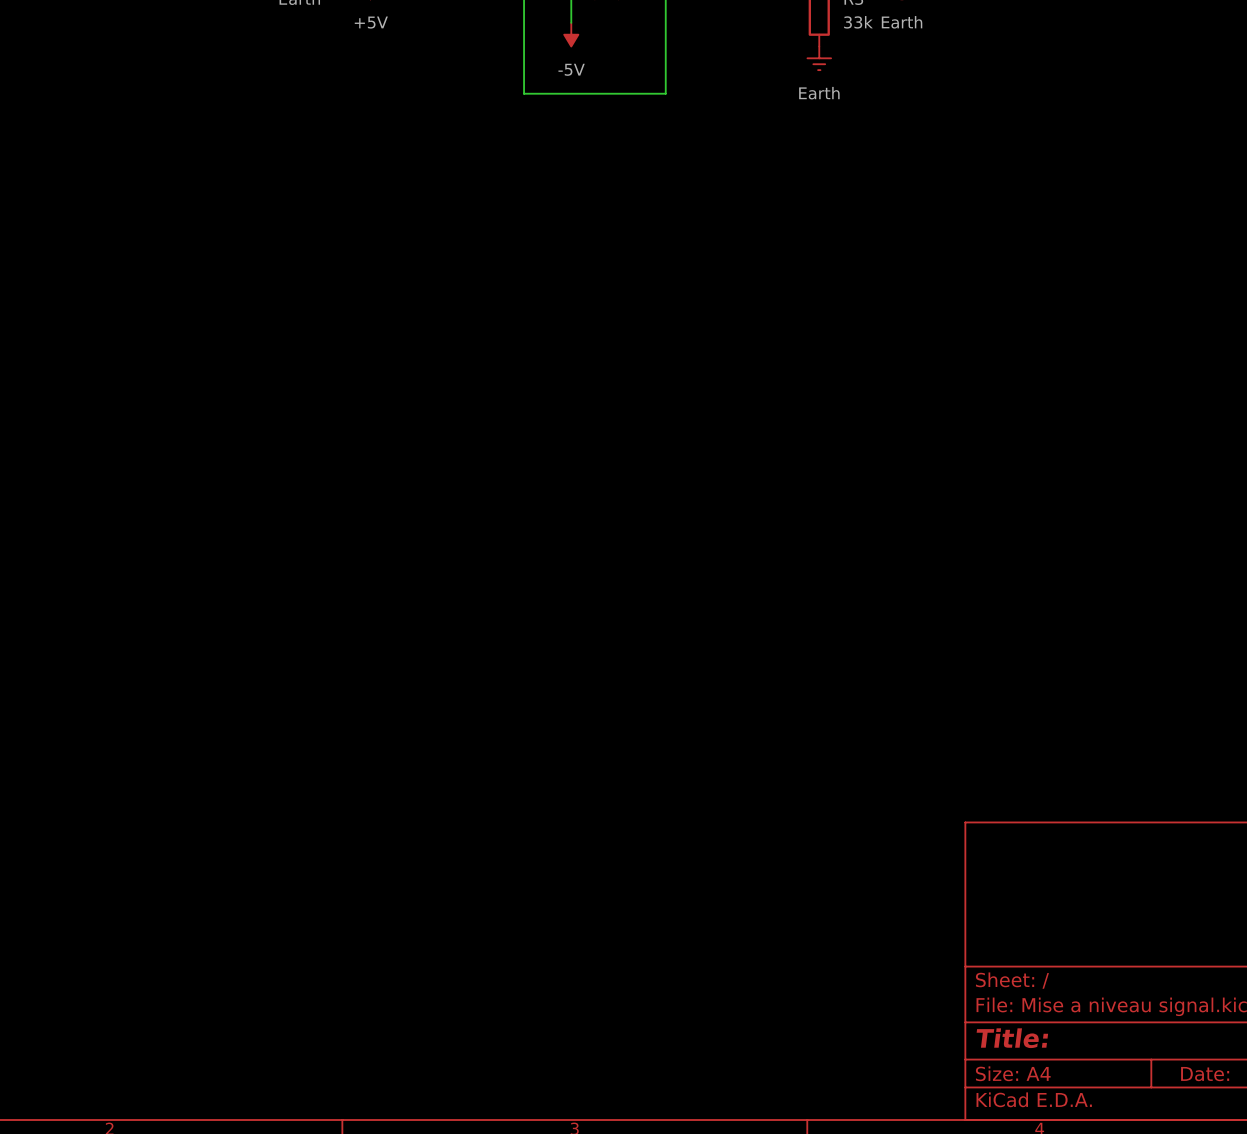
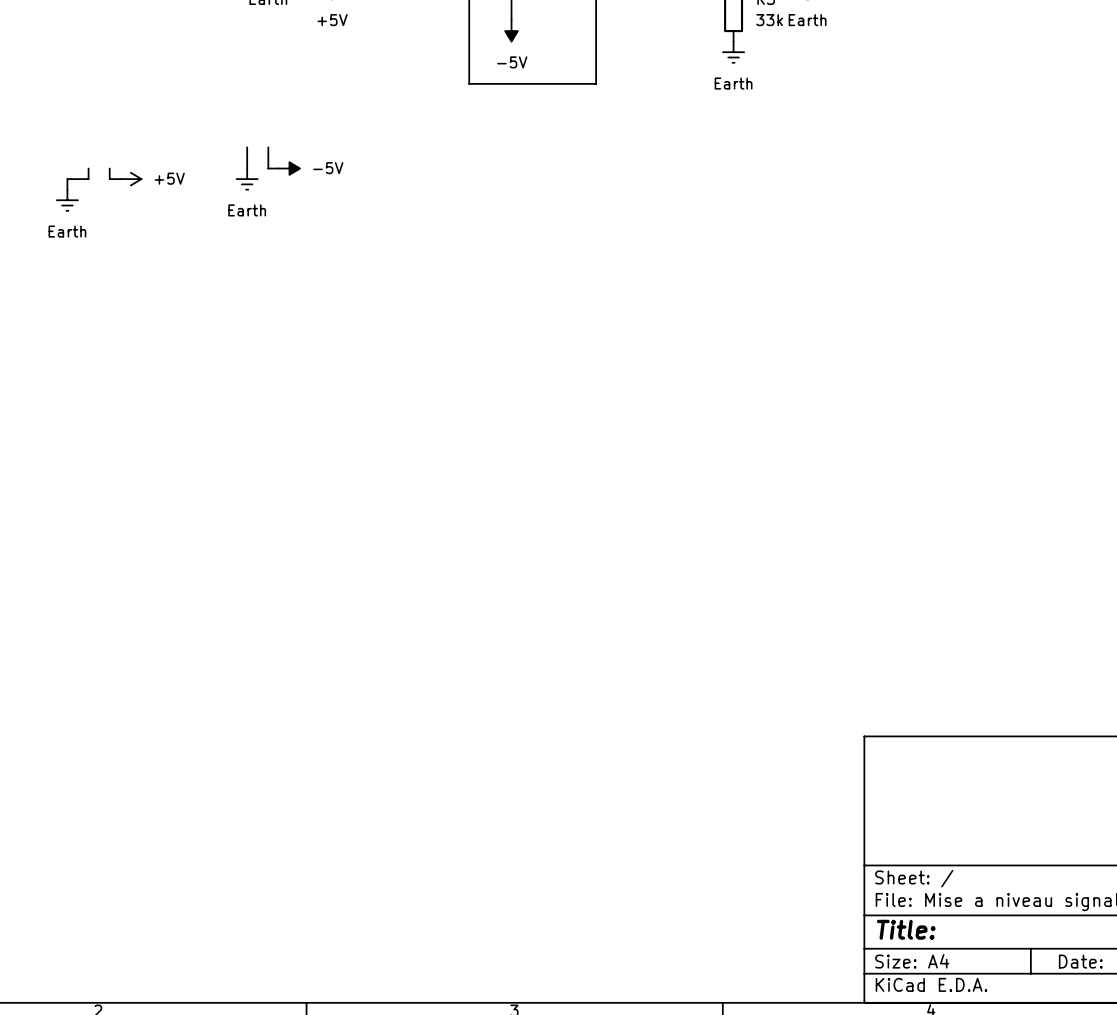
wire: none -> (247, 147) (247, 168)
wire: none -> (268, 147) (268, 168) (278, 168)
wire: none -> (88, 168) (88, 179) (67, 179) (67, 189)
wire: none -> (109, 168) (109, 179) (120, 179)
power symbol: none -> -5V (289, 168)
power symbol: none -> +5V (130, 179)
power symbol: none -> Earth (247, 179)
power symbol: none -> Earth (67, 200)

